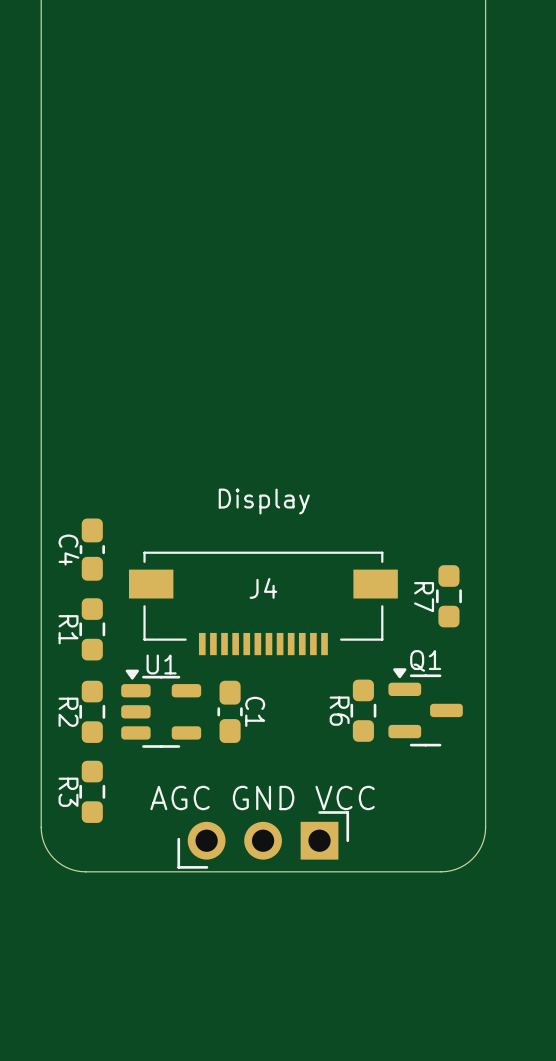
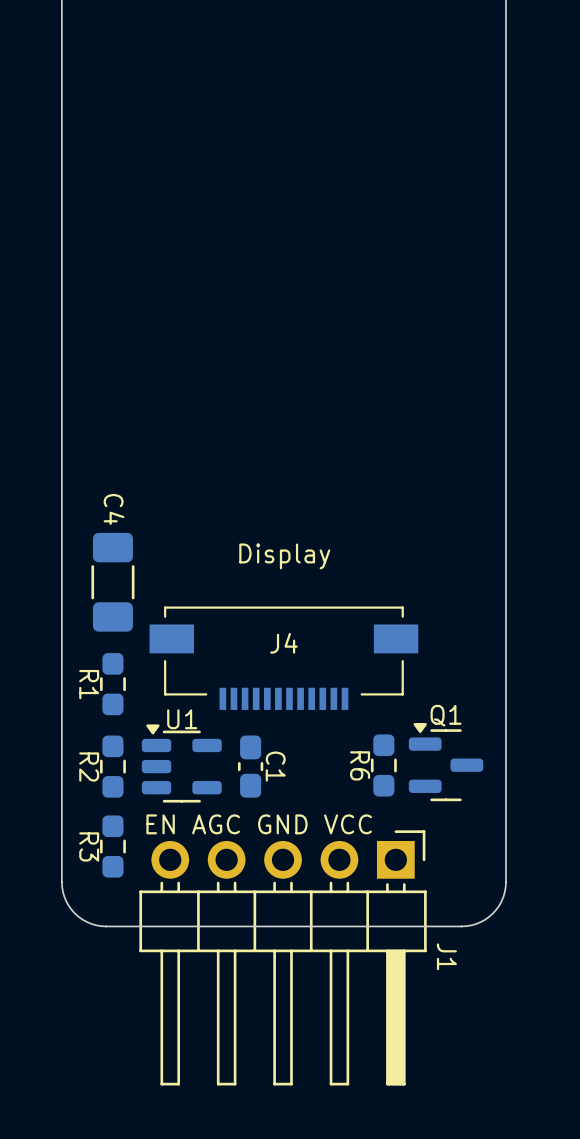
C4 footprint: [79, 518, 105, 581] -> [91, 532, 135, 632]
C4 name position: C4 (68, 550) -> C4 (114, 509)
R7: (448, 596) -> none
text: AGC GND VCC (262, 798) -> EN AGC GND VCC (259, 824)
part: (263, 839) -> none
J1: none -> (283, 957)

